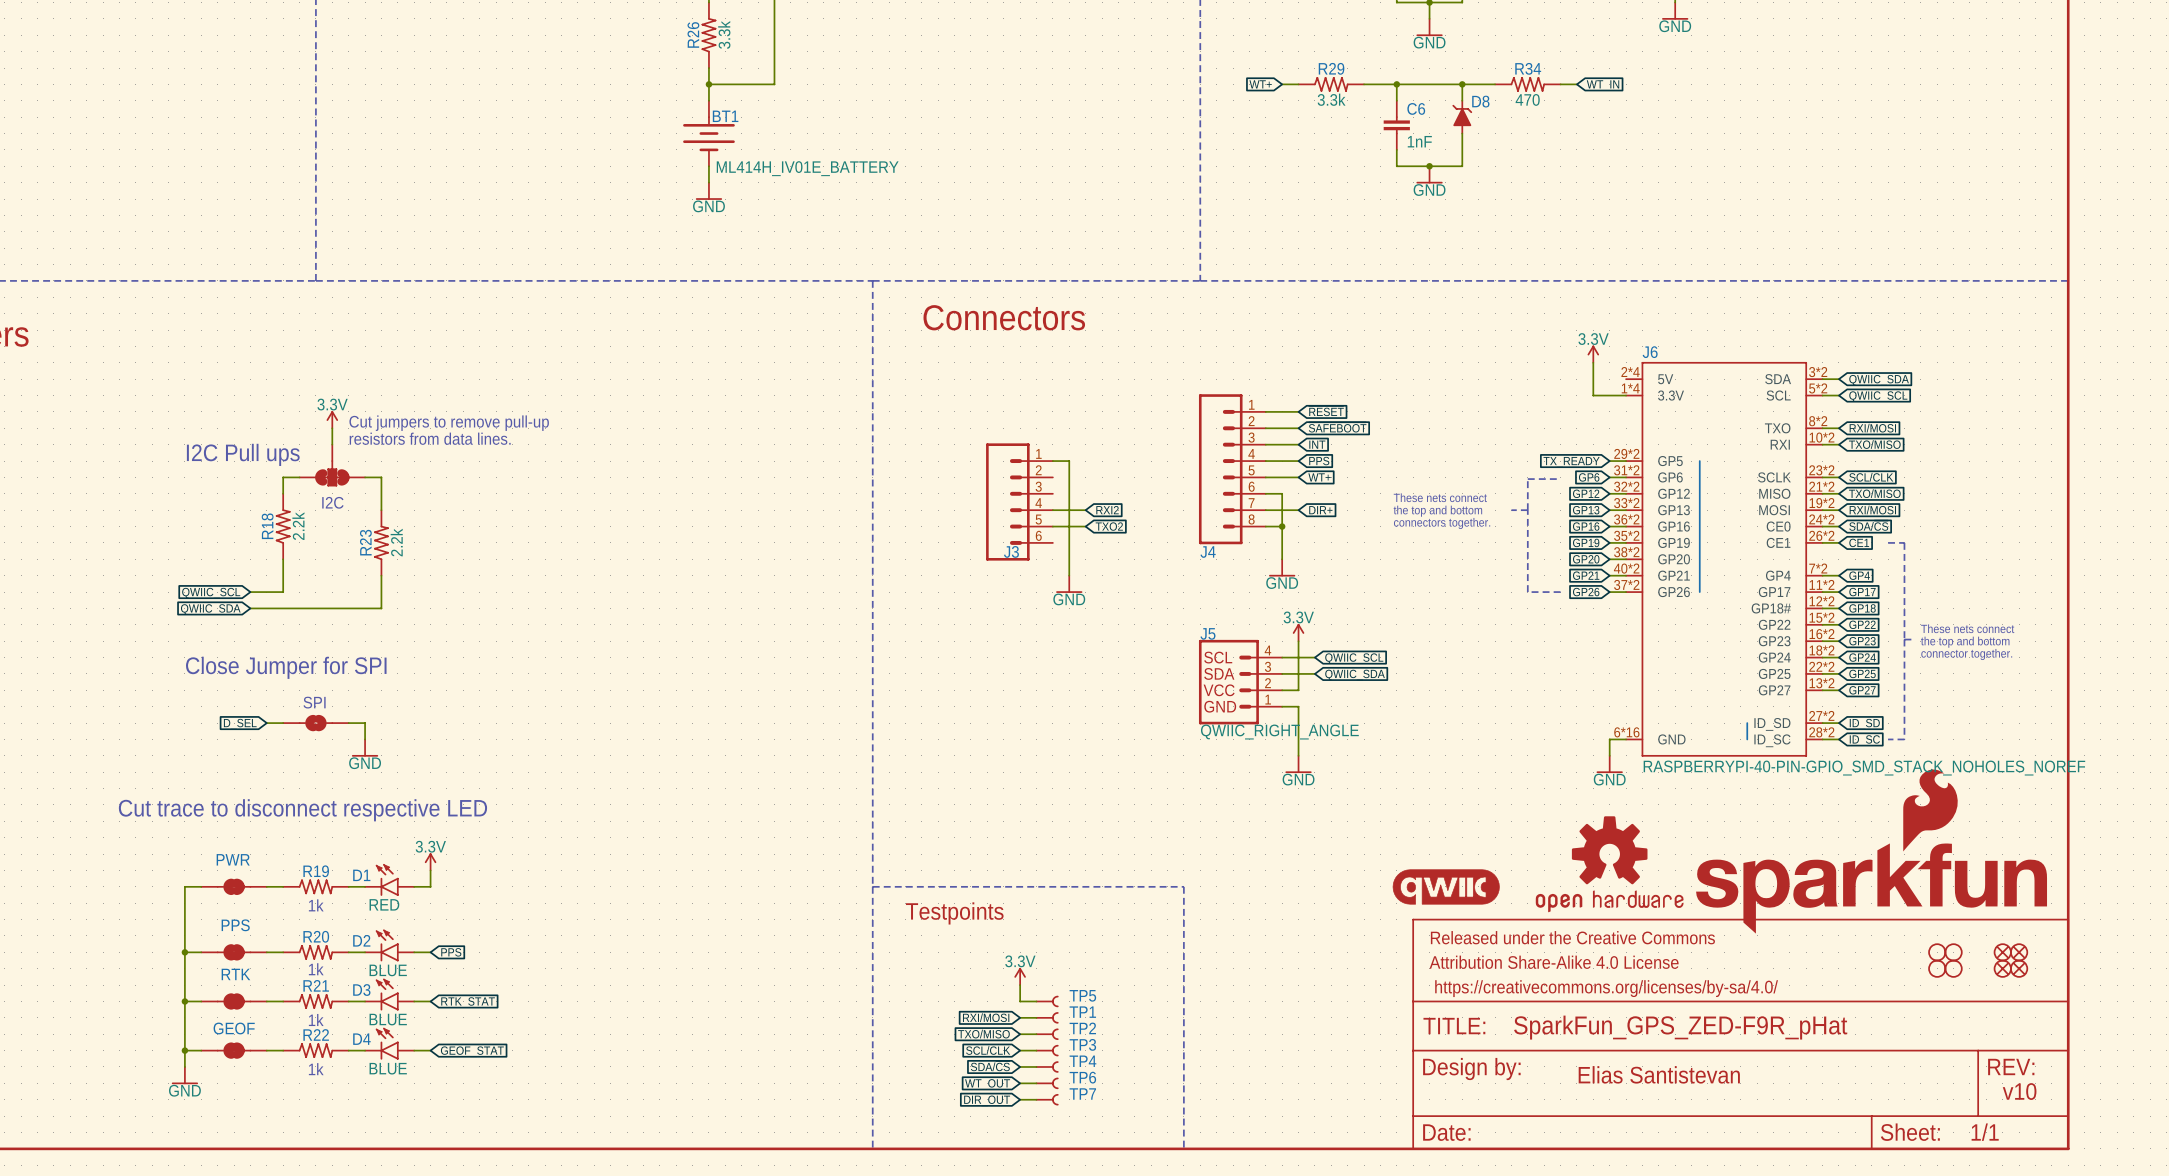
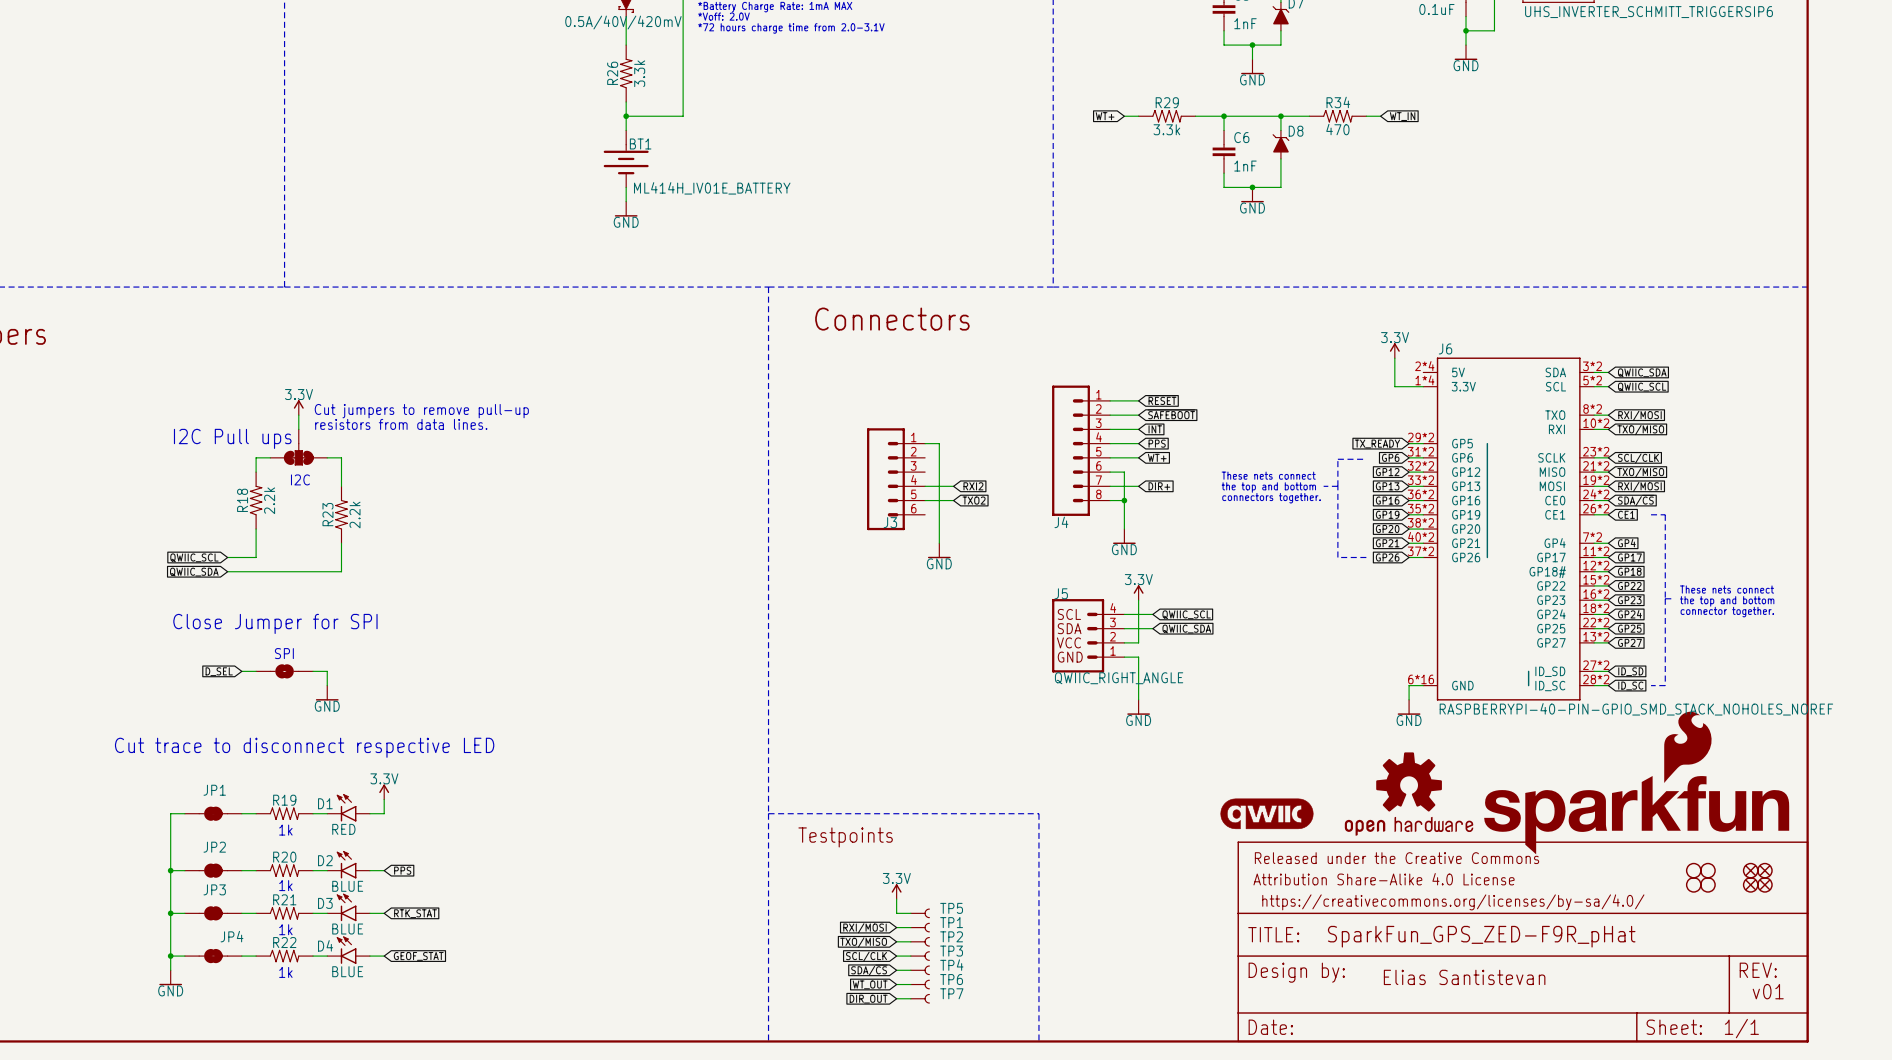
PWR name: PWR (233, 859) -> JP1 (214, 790)
PPS name: PPS (235, 925) -> JP2 (214, 847)
RTK name: RTK (235, 974) -> JP3 (214, 889)
GEOF name: GEOF (234, 1028) -> JP4 (232, 936)
text: v10 (2019, 1091) -> v01 (1768, 991)

